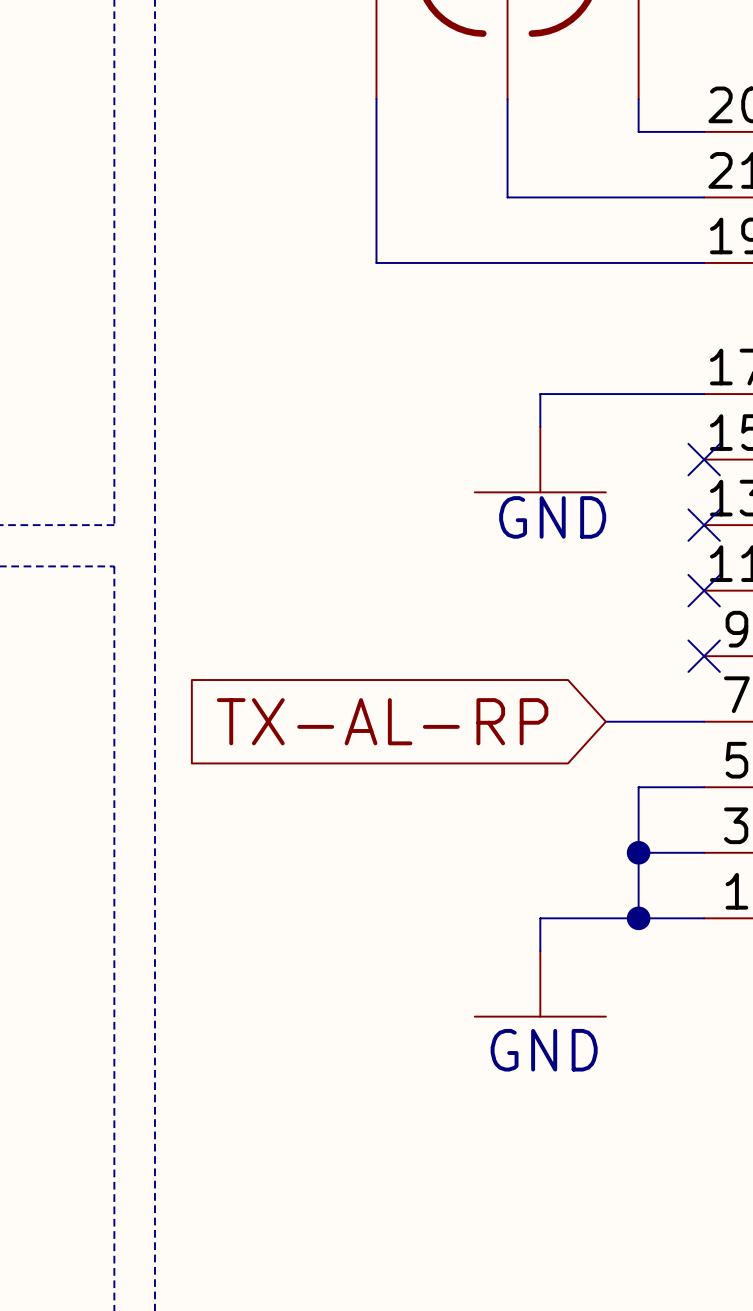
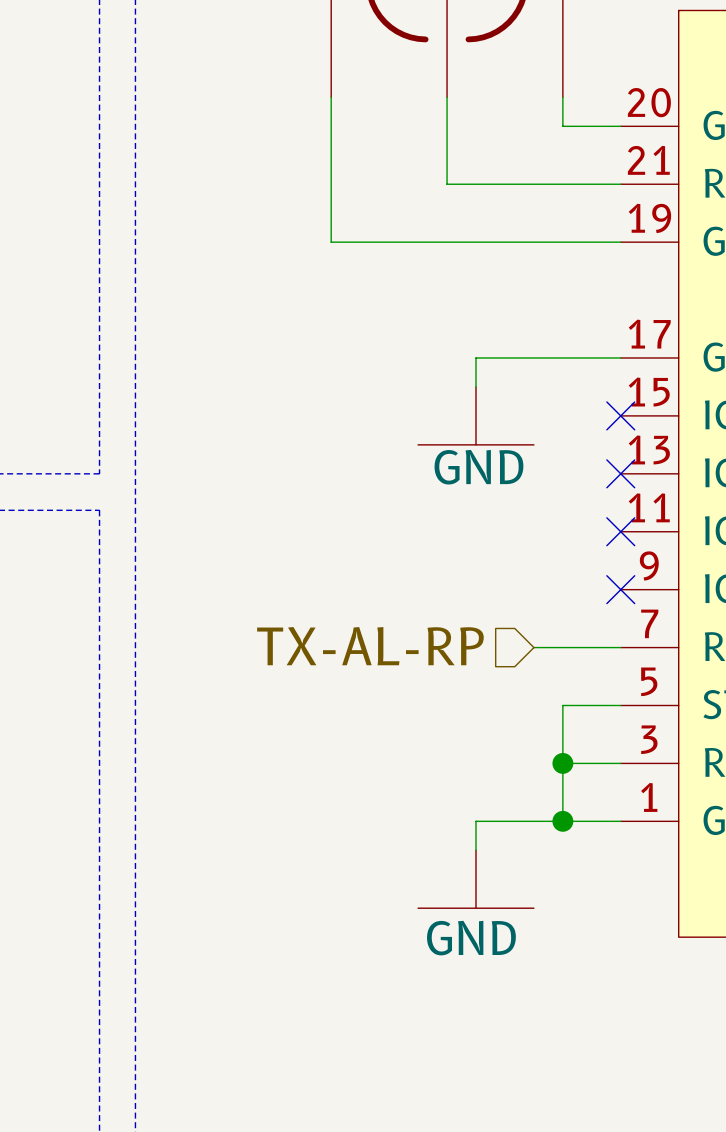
hierarchical label: none -> TX-AL-RP (370, 646)
global label: TX-AL-RP (382, 721) -> none

